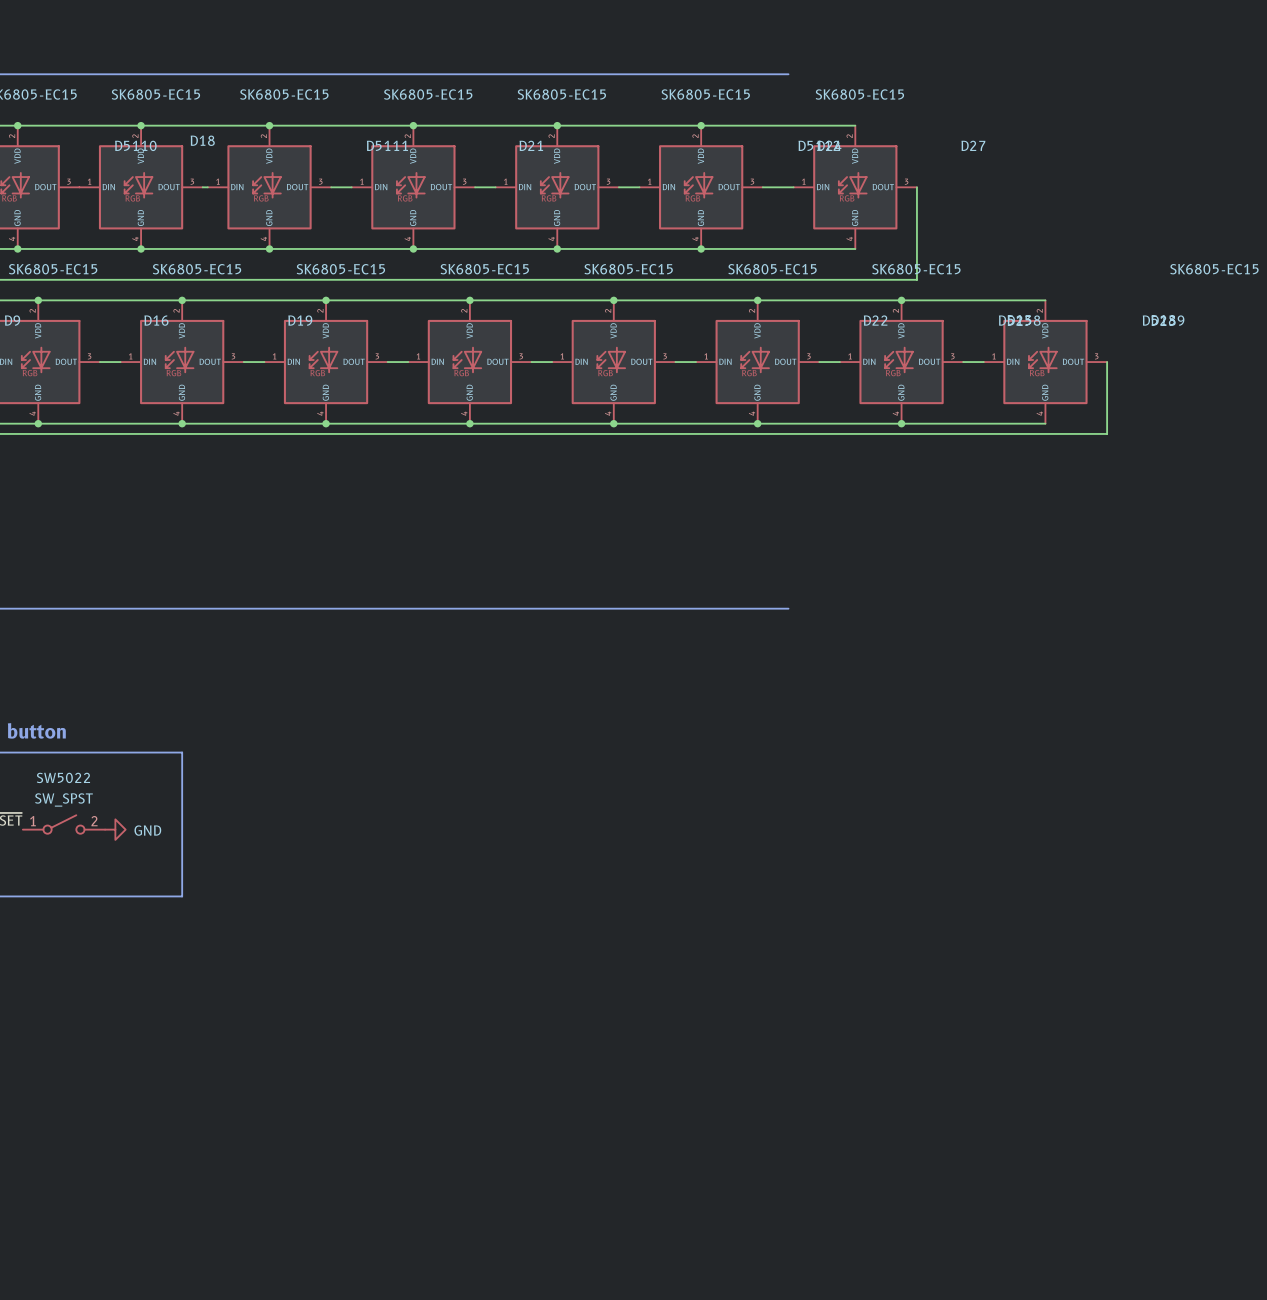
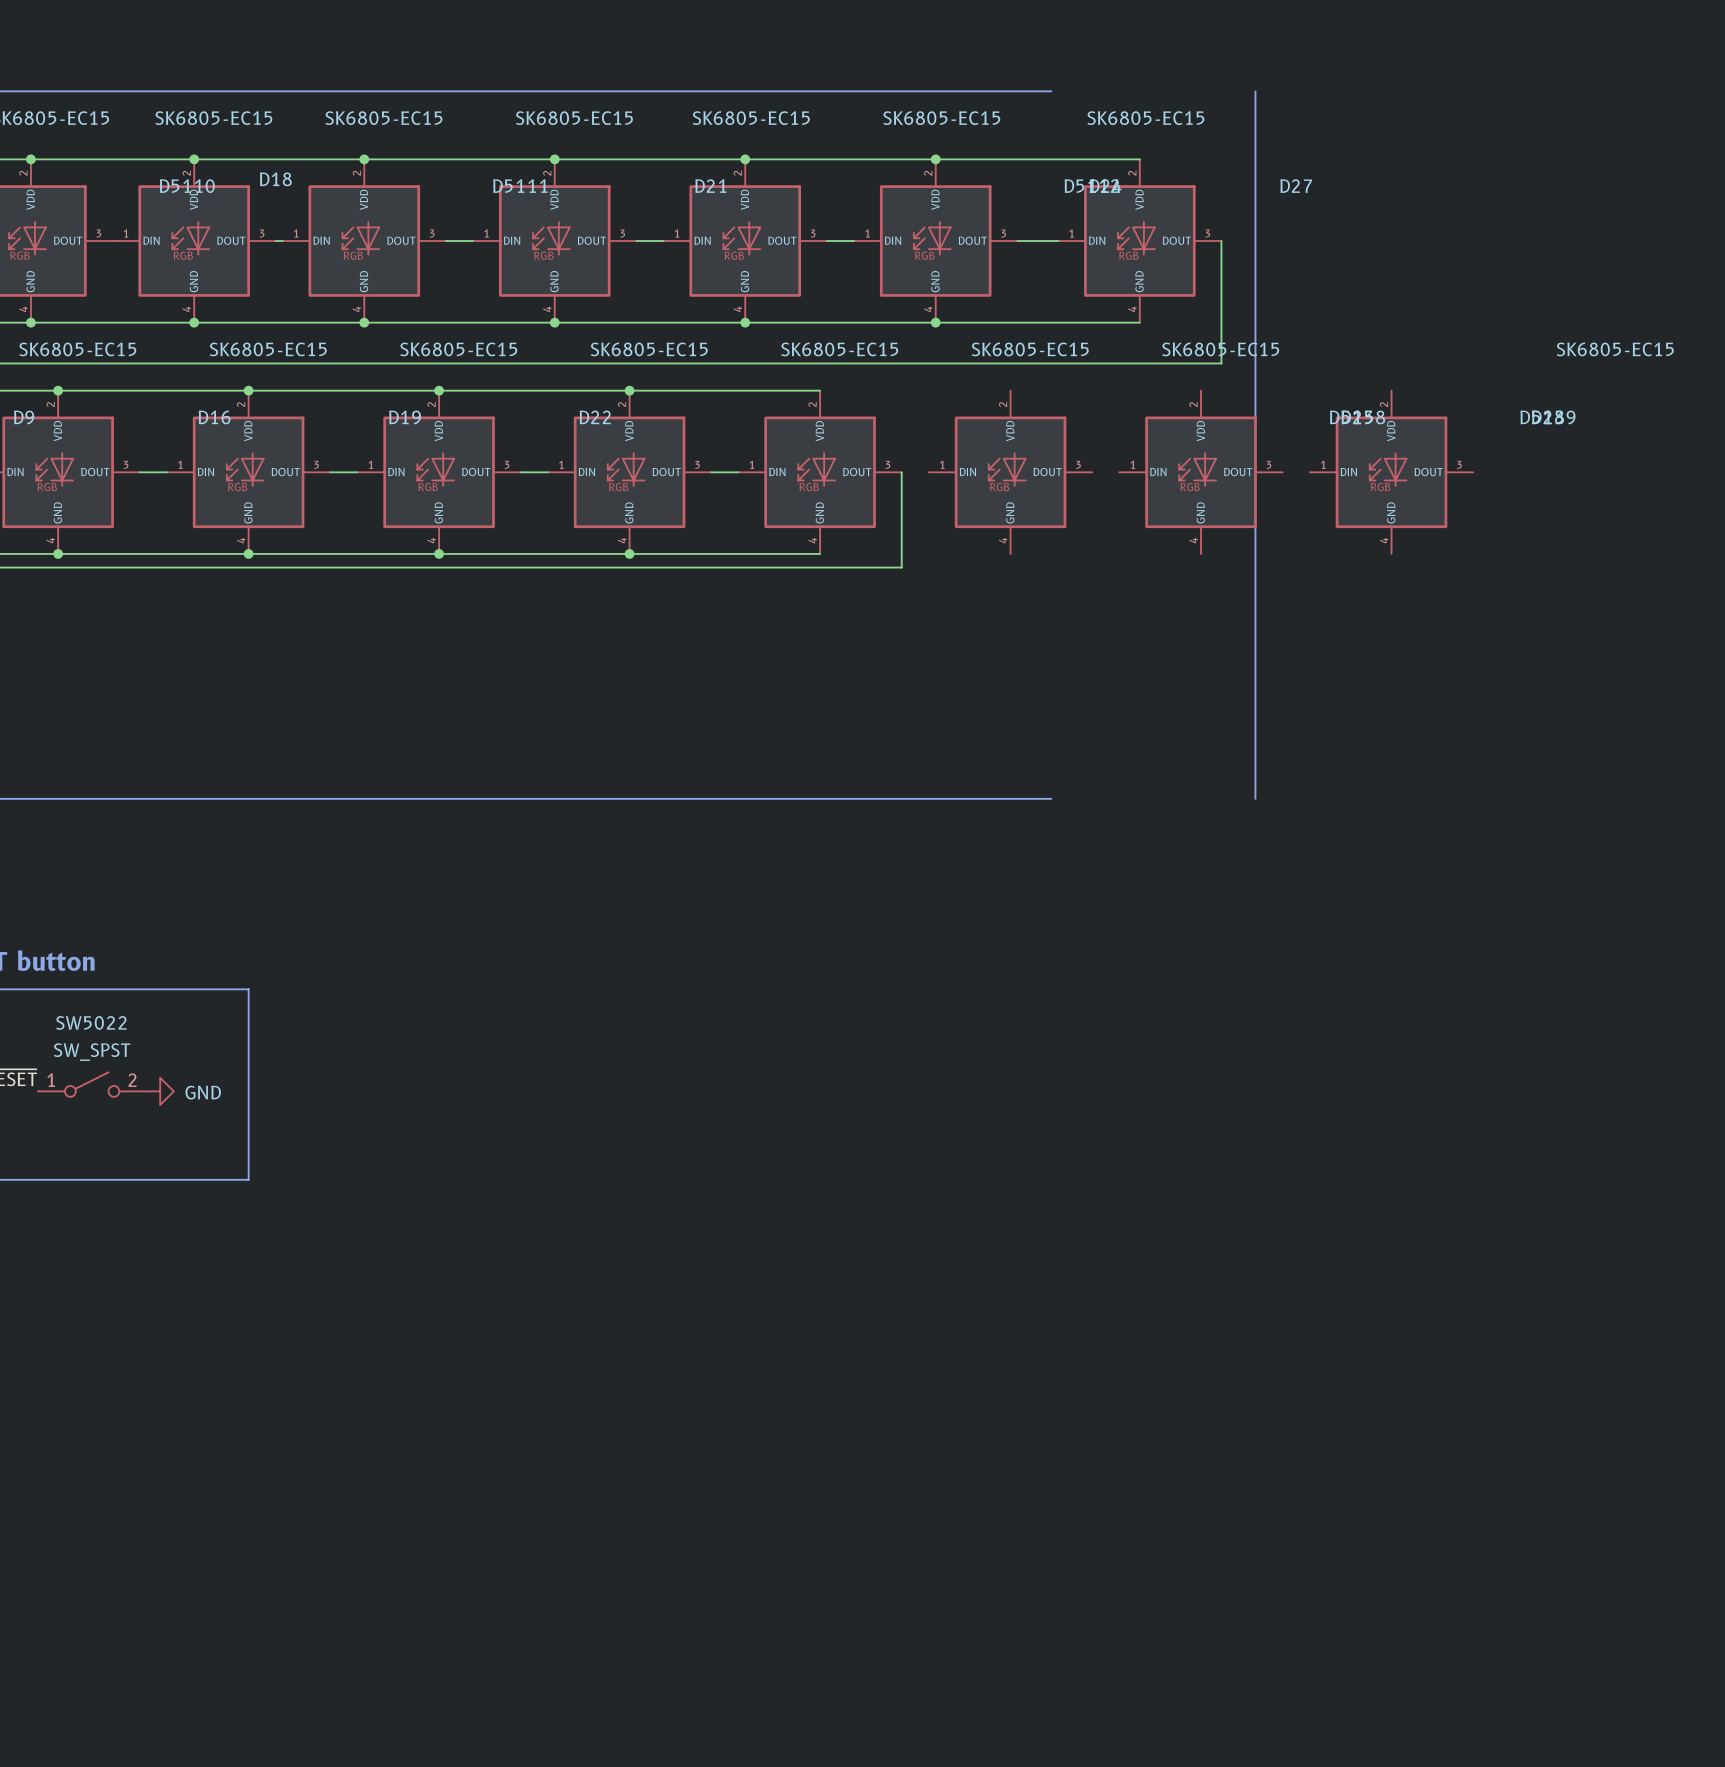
line: none -> (1255, 91) (1255, 798)
wire: (613, 300) (1045, 300) -> none
junction: (613, 300) -> none
junction: (757, 300) -> none
junction: (901, 300) -> none
D22 name position: D22 (875, 320) -> D22 (595, 417)
wire: (675, 362) (696, 362) -> (901, 472) (901, 567)
wire: (819, 362) (839, 362) -> none
wire: (963, 362) (983, 362) -> none
wire: (1107, 362) (1107, 433) (675, 433) -> none
wire: (613, 423) (1045, 423) -> none
junction: (613, 423) -> none
junction: (757, 423) -> none
junction: (901, 423) -> none

